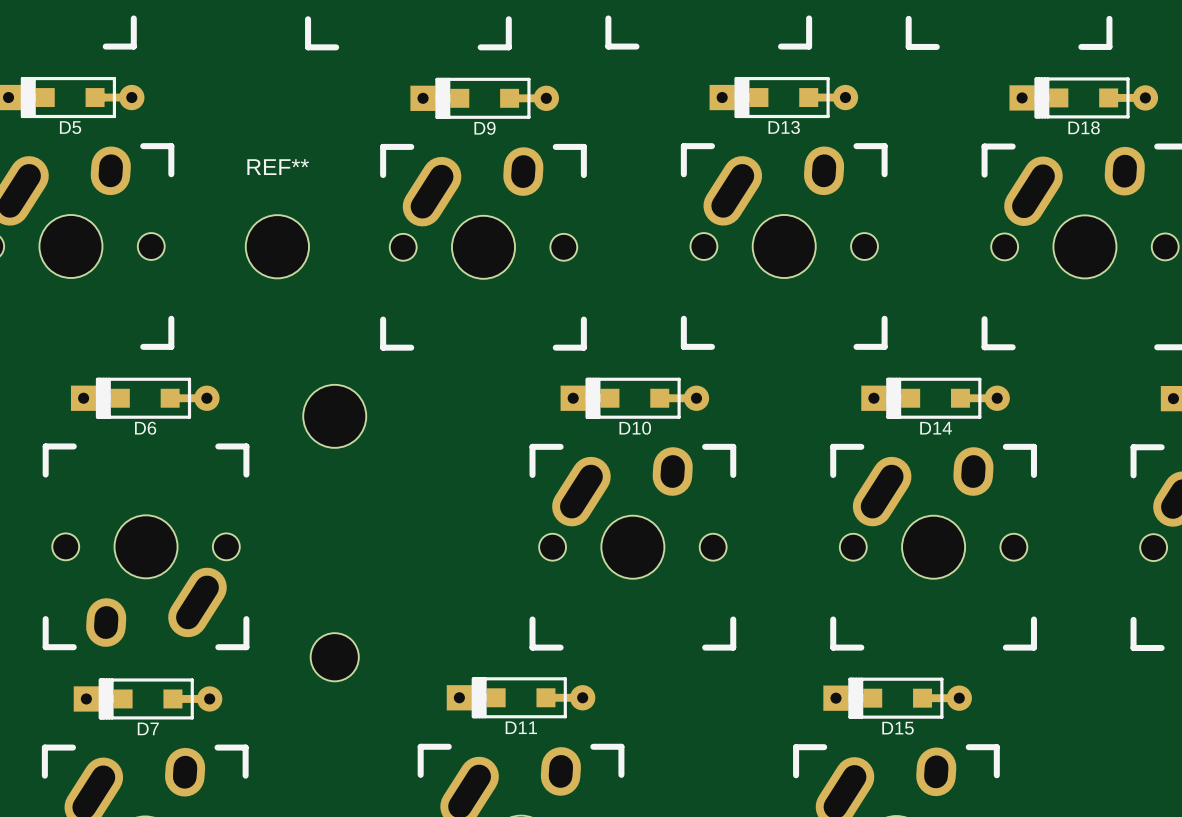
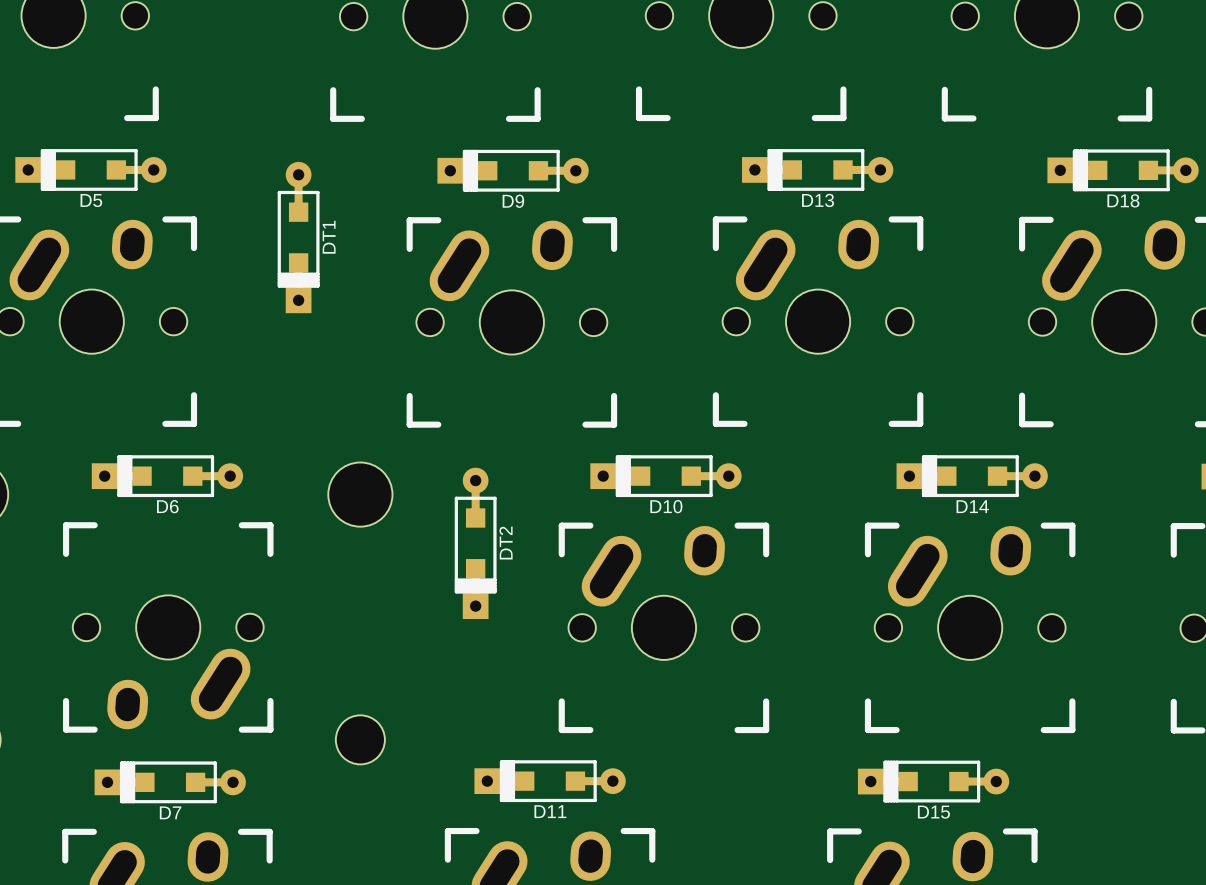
DT1: none -> (298, 237)
REF**: (277, 246) -> none
DT2: none -> (475, 543)

